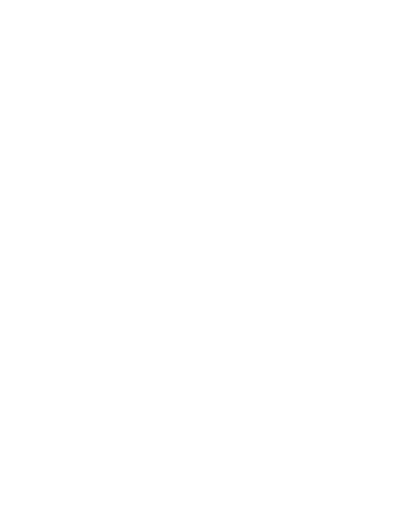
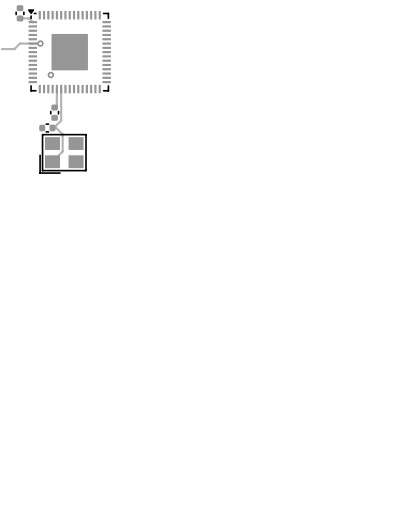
part: none -> (20, 13)
track: none -> (20, 18) (29, 18) (32, 22)
track: none -> (40, 43) (19, 43) (14, 49) (1, 49)
via: none -> (40, 43)
part: none -> (69, 51)
via: none -> (50, 75)
track: none -> (56, 89) (56, 99)
track: none -> (61, 89) (61, 120) (53, 128)
track: none -> (56, 99) (56, 105) (54, 107)
part: none -> (54, 112)
part: none -> (47, 128)
track: none -> (52, 128) (56, 128) (62, 134) (62, 151) (52, 161)
part: none -> (63, 153)

